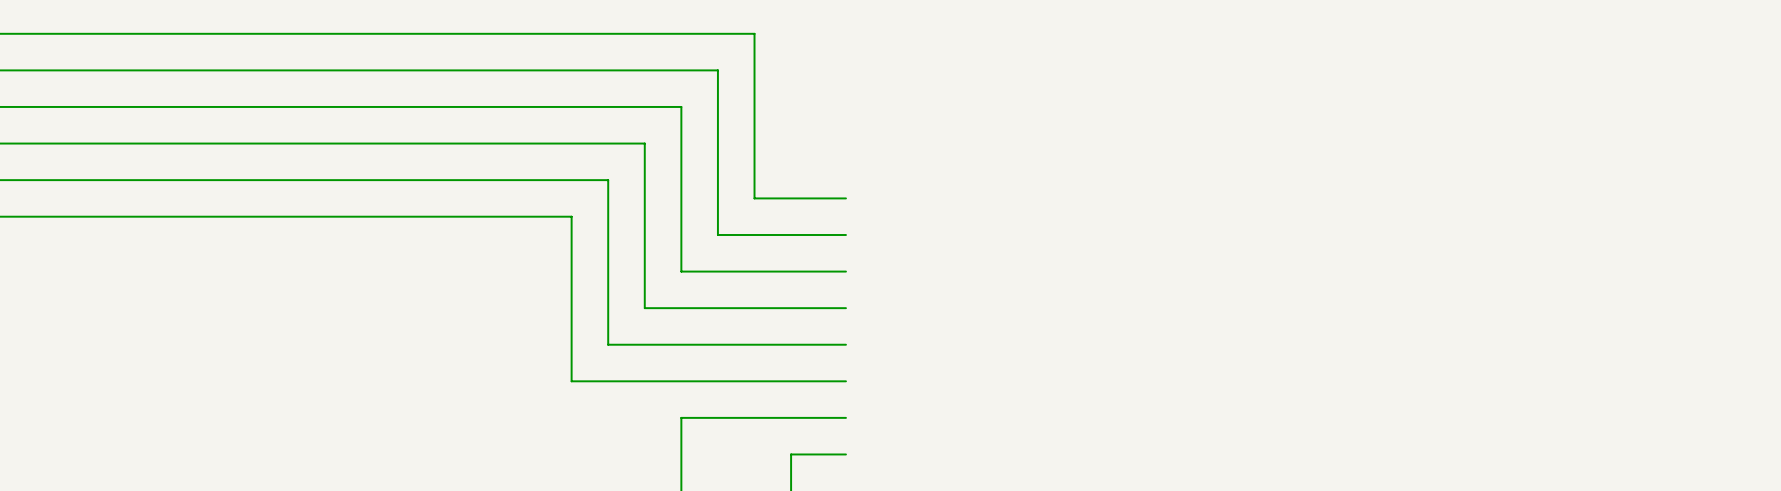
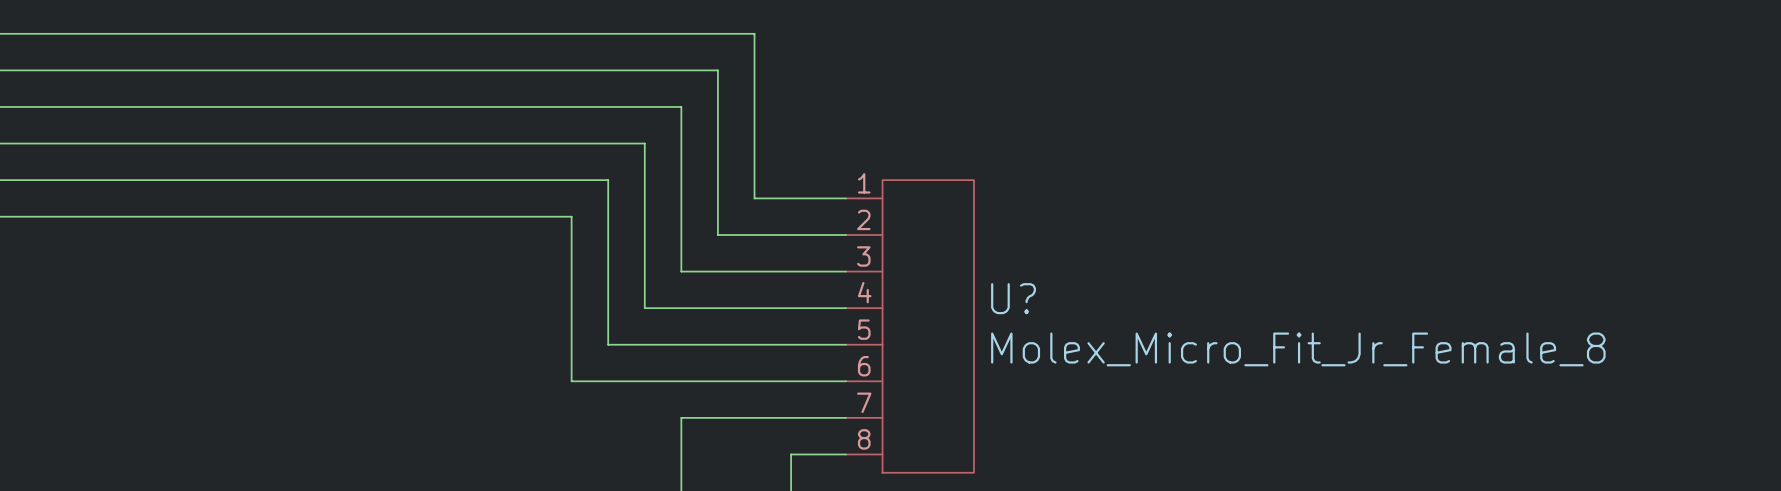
U?: none -> Molex_Micro_Fit_Jr_Female_8 (909, 326)

